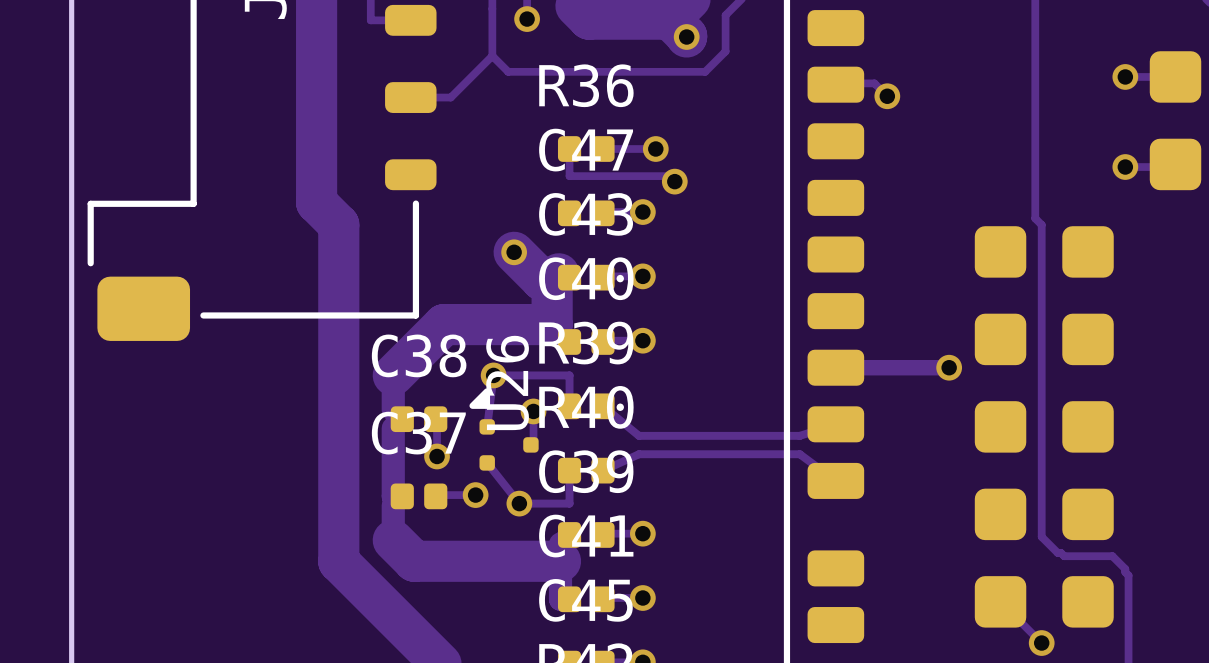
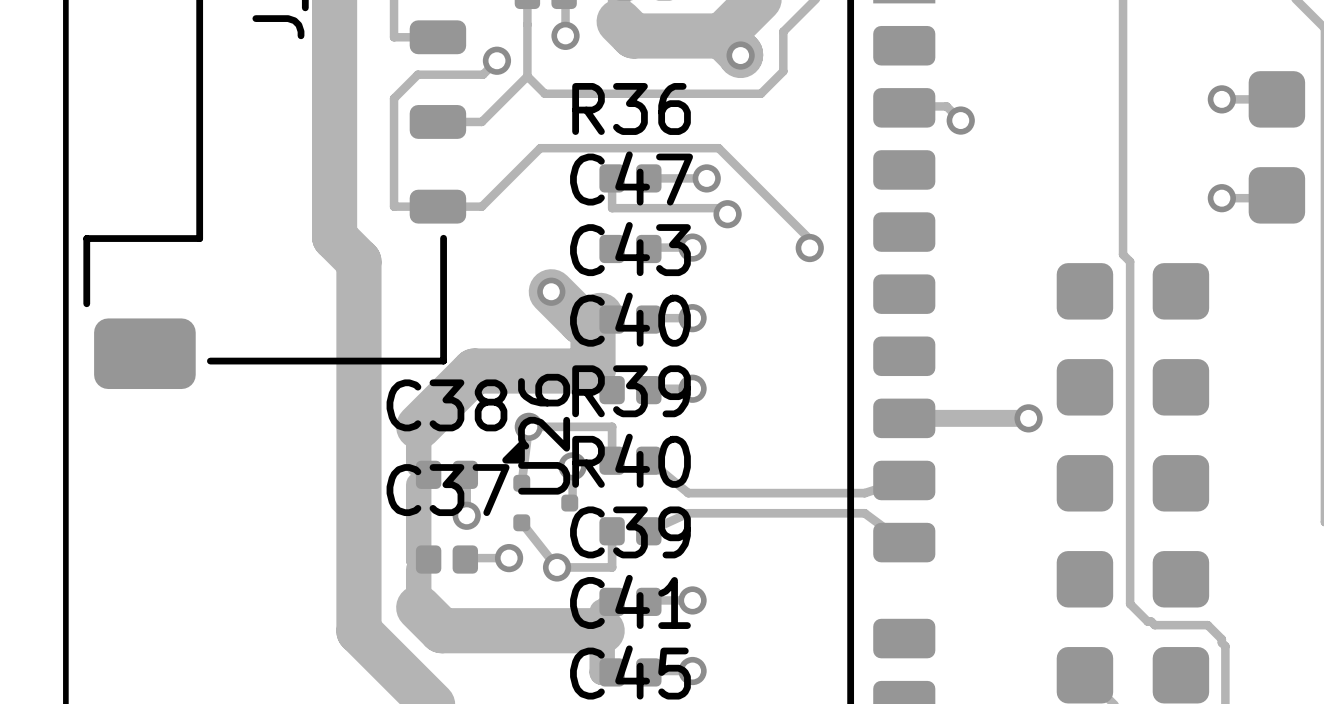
track: none -> (496, 60) (482, 74) (417, 74) (394, 98) (394, 206) (481, 206) (540, 148) (718, 148) (809, 239) (809, 248)
via: none -> (496, 60)
via: none -> (809, 248)

